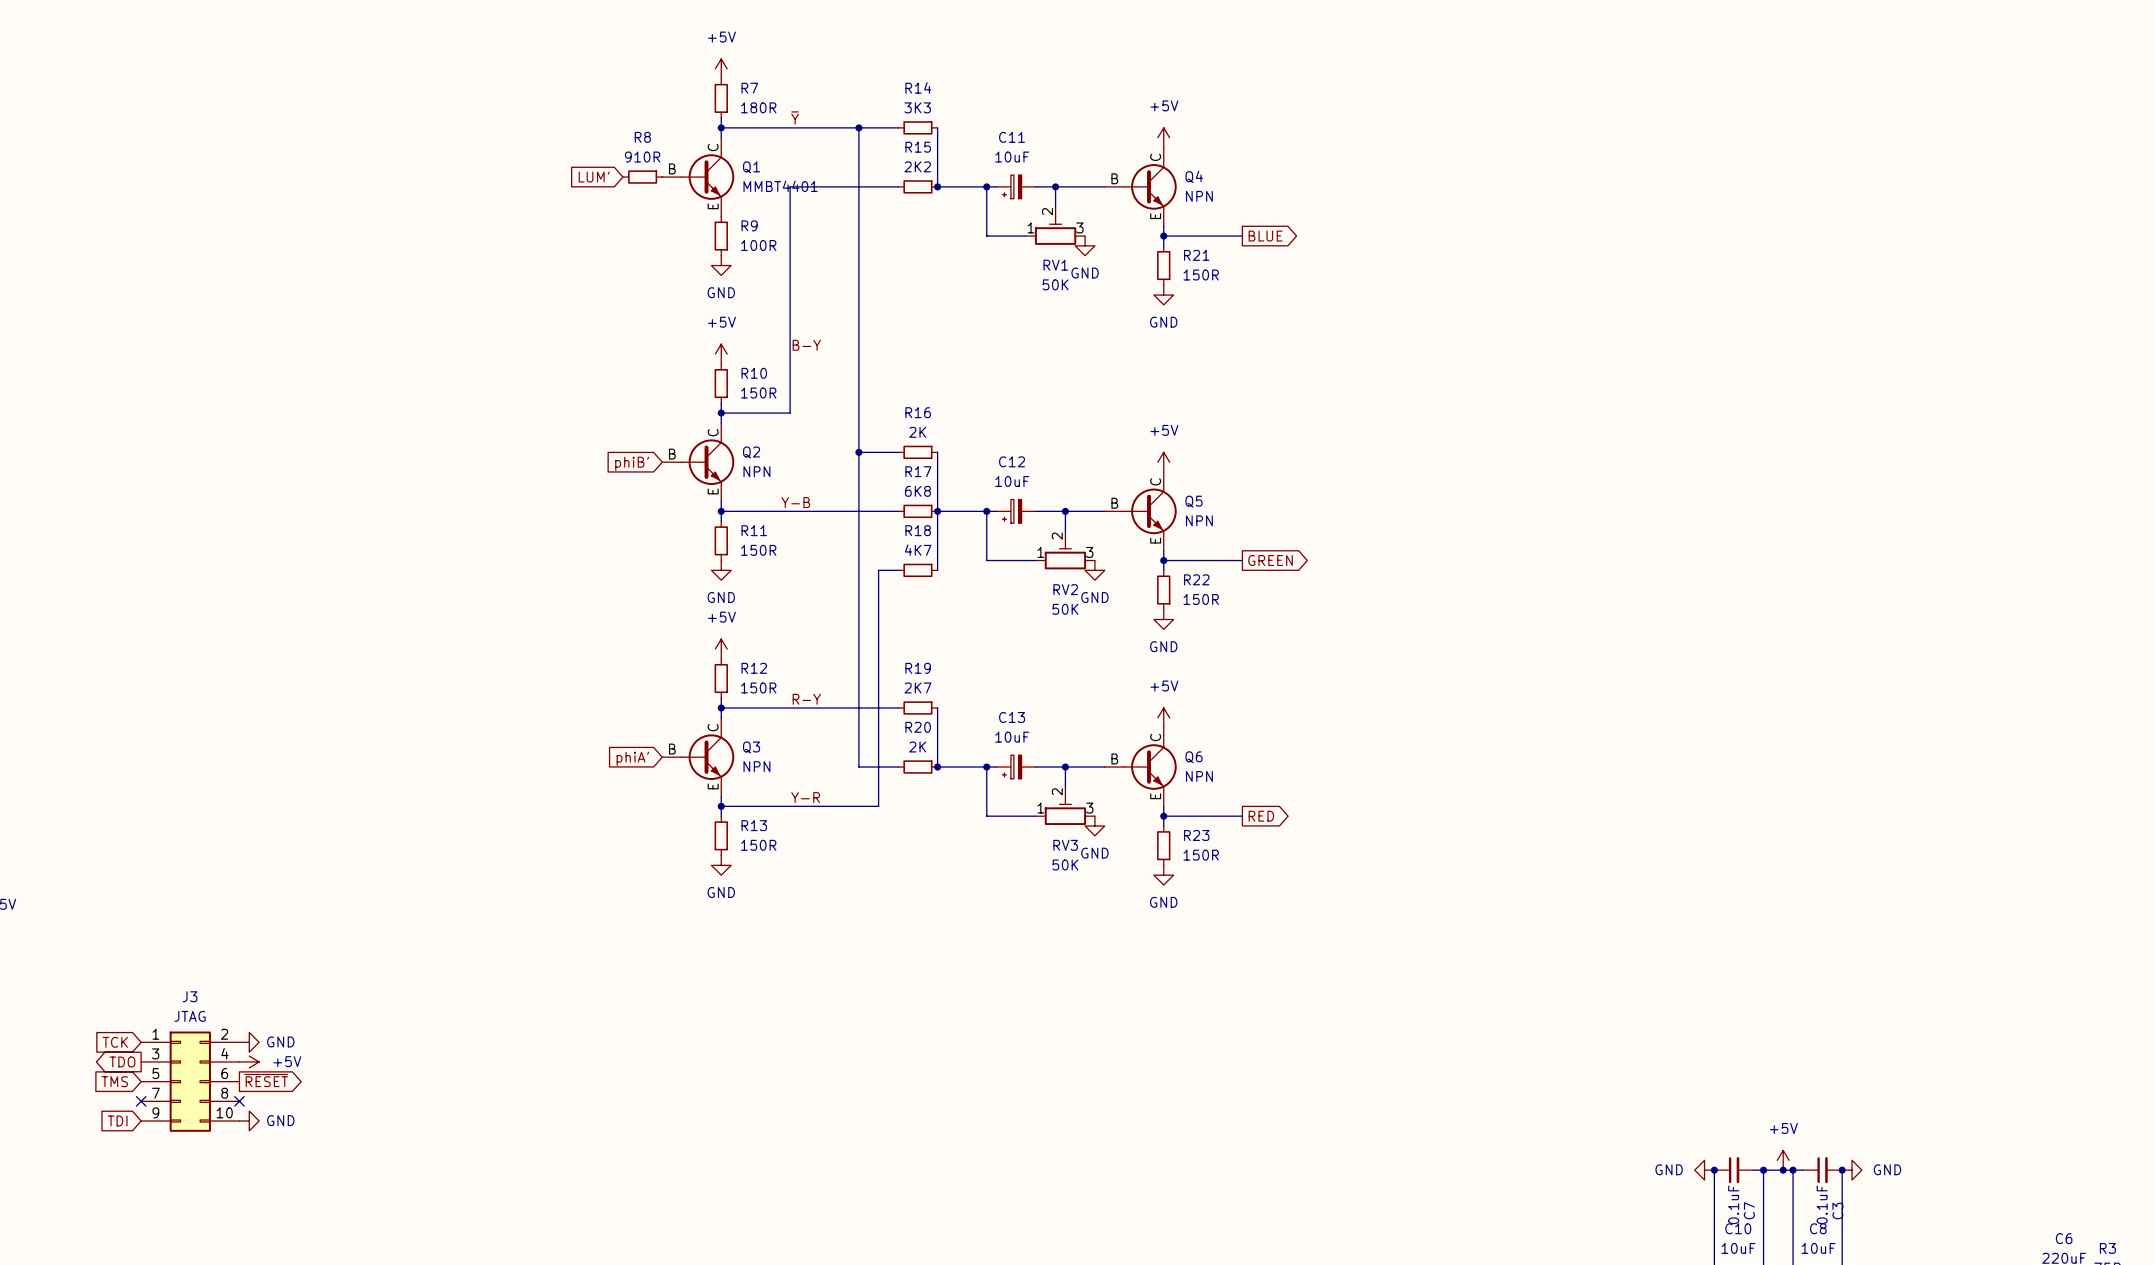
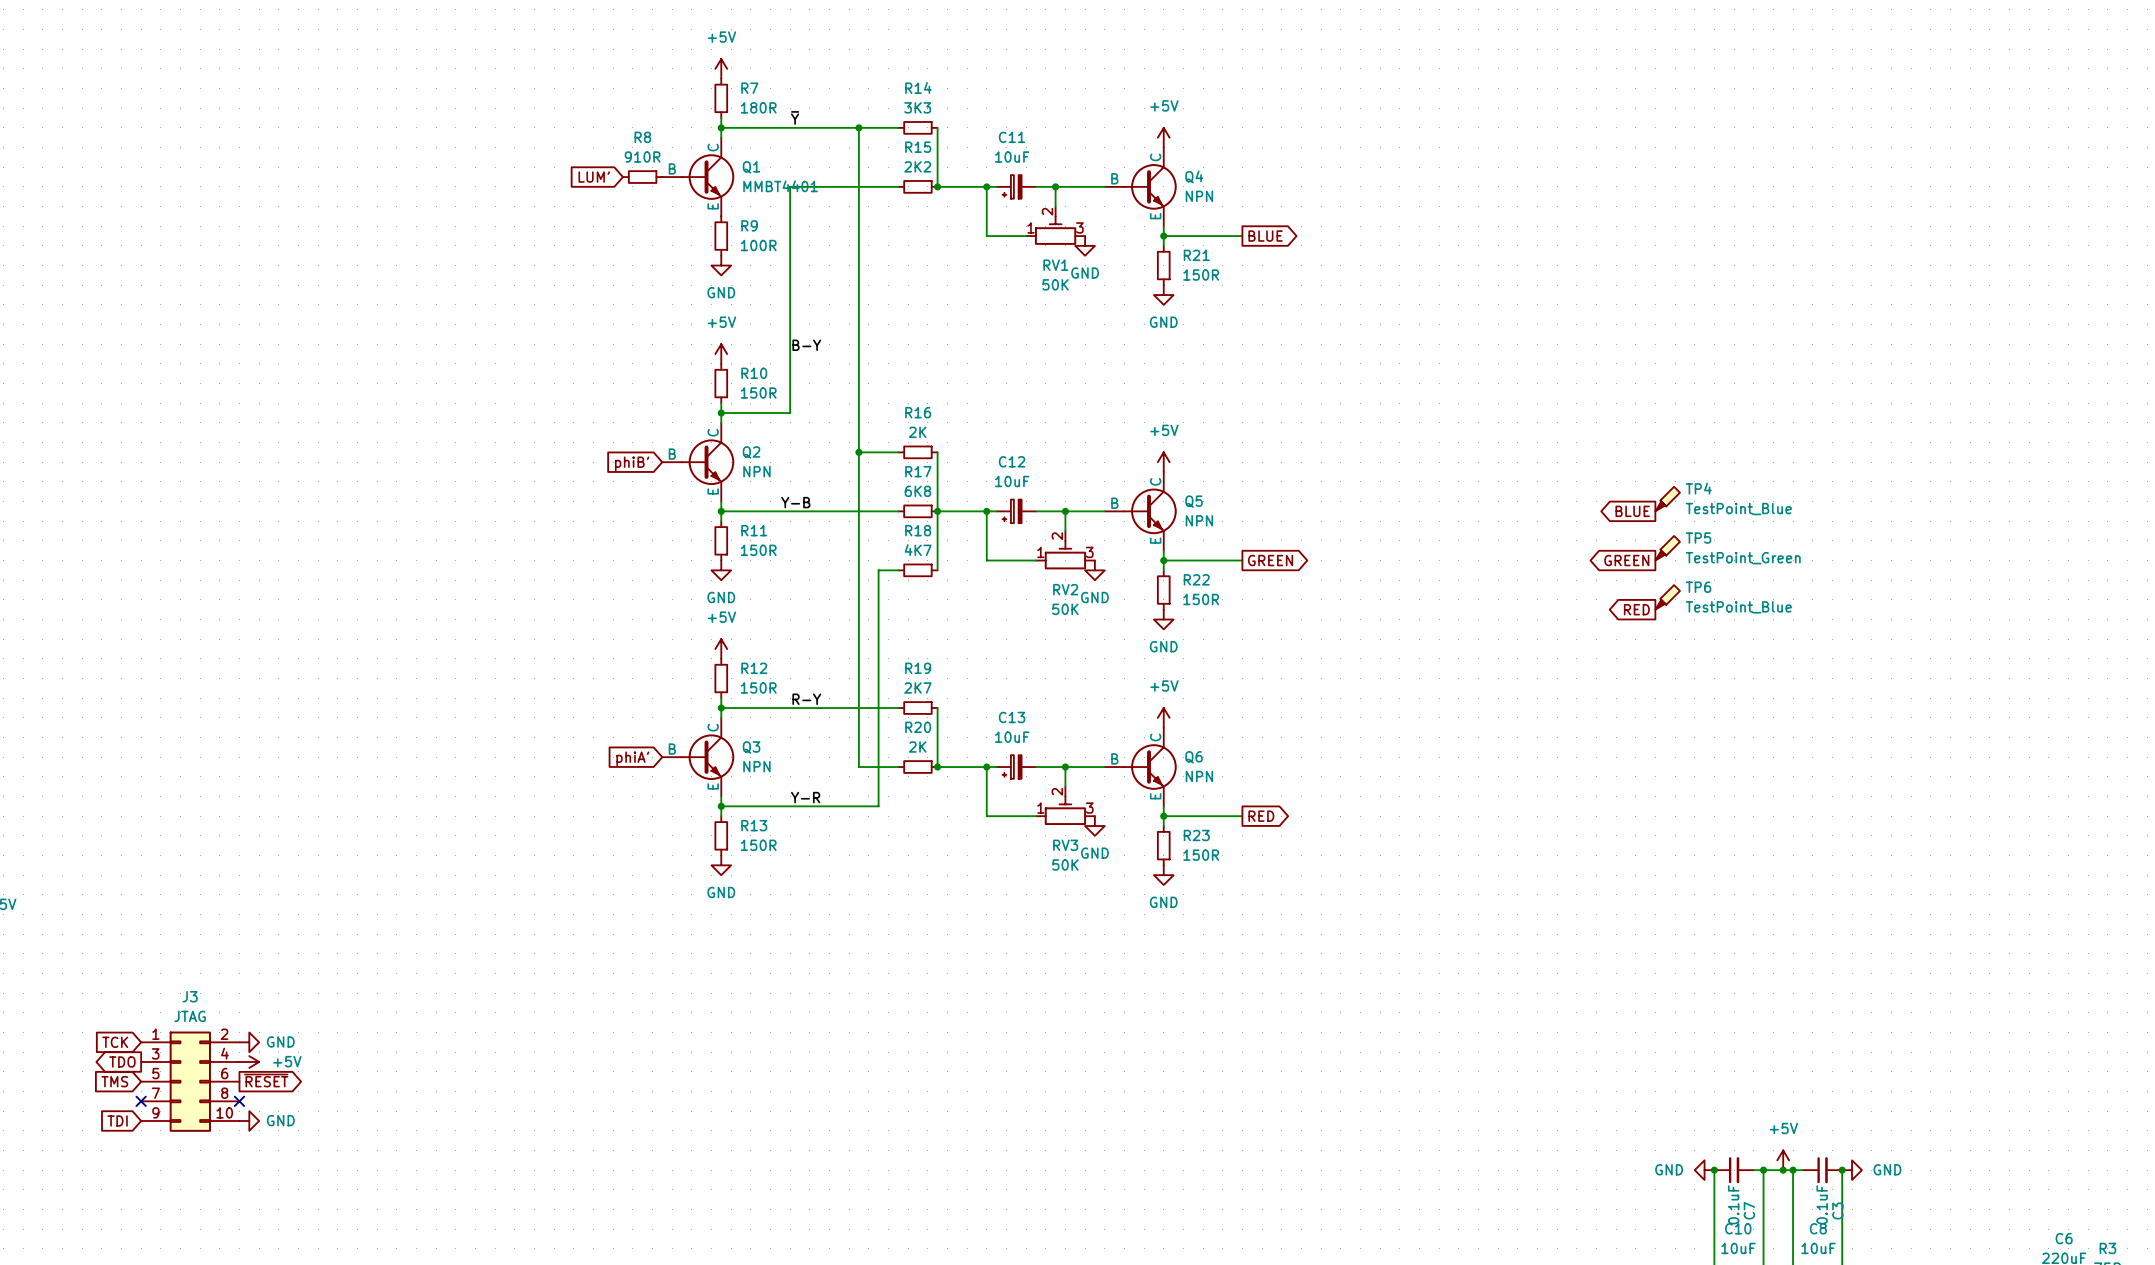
TP4: none -> TestPoint_Blue (1667, 499)
global label: none -> BLUE (1632, 511)
TP5: none -> TestPoint_Green (1667, 548)
global label: none -> GREEN (1626, 560)
TP6: none -> TestPoint_Blue (1667, 597)
global label: none -> RED (1636, 609)

